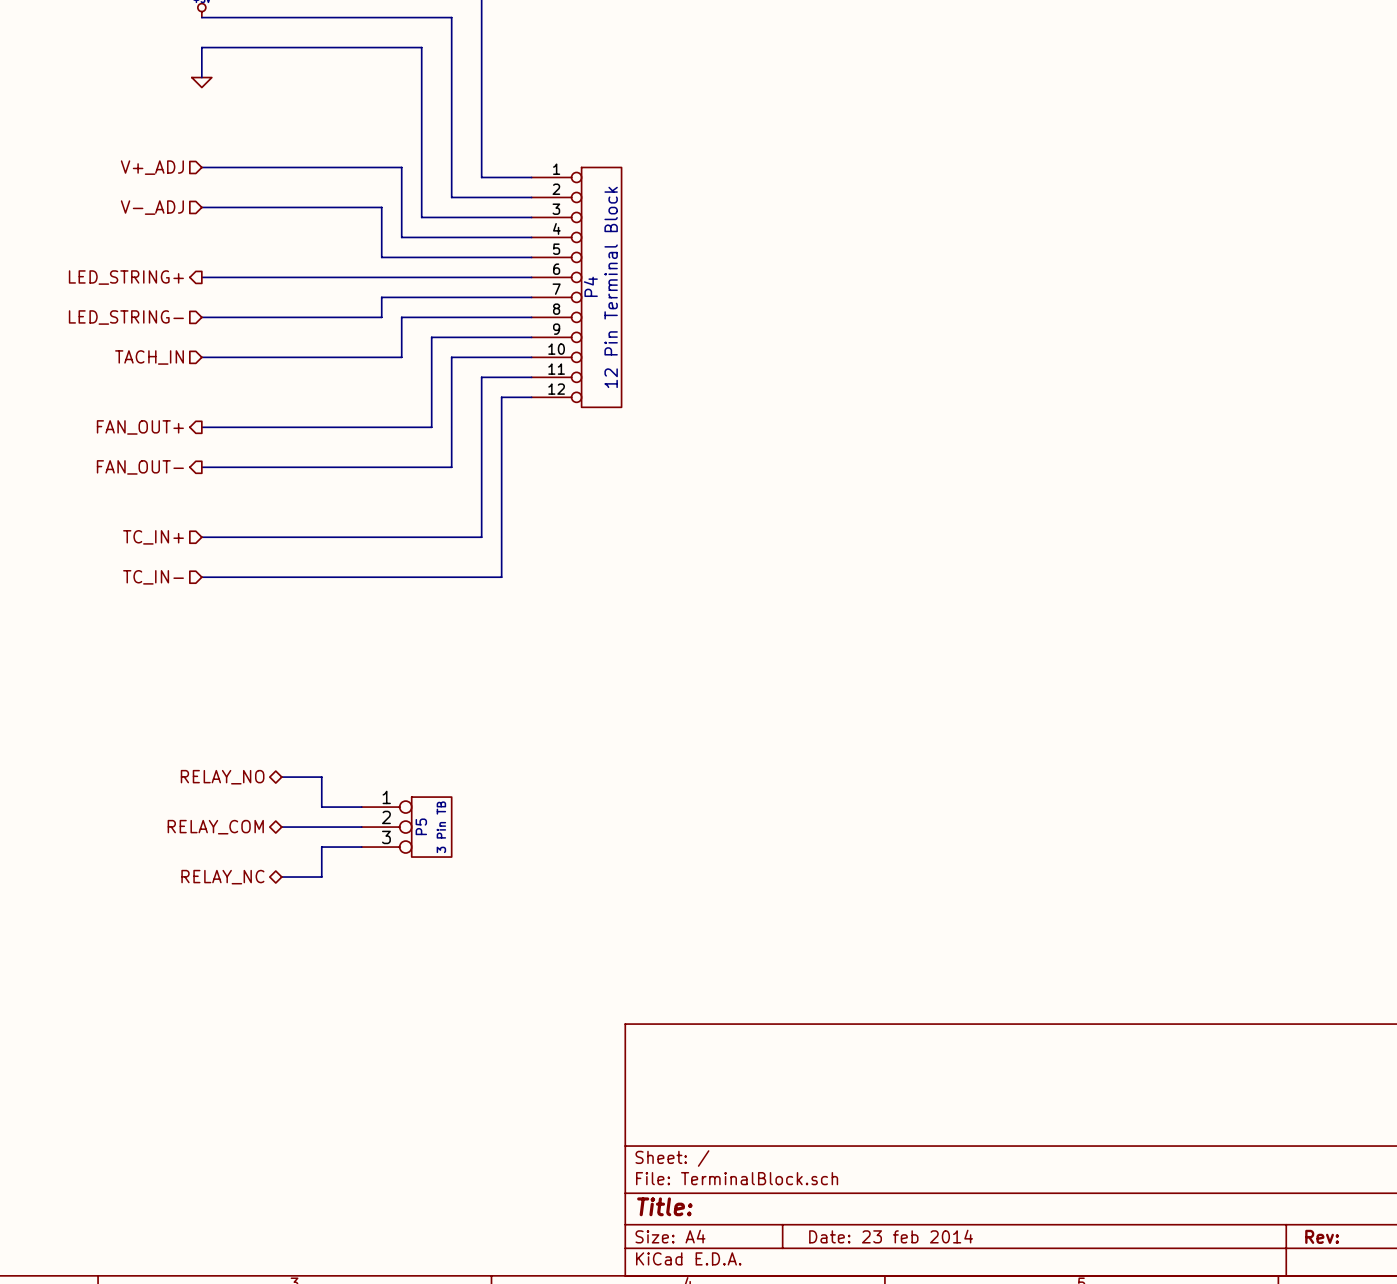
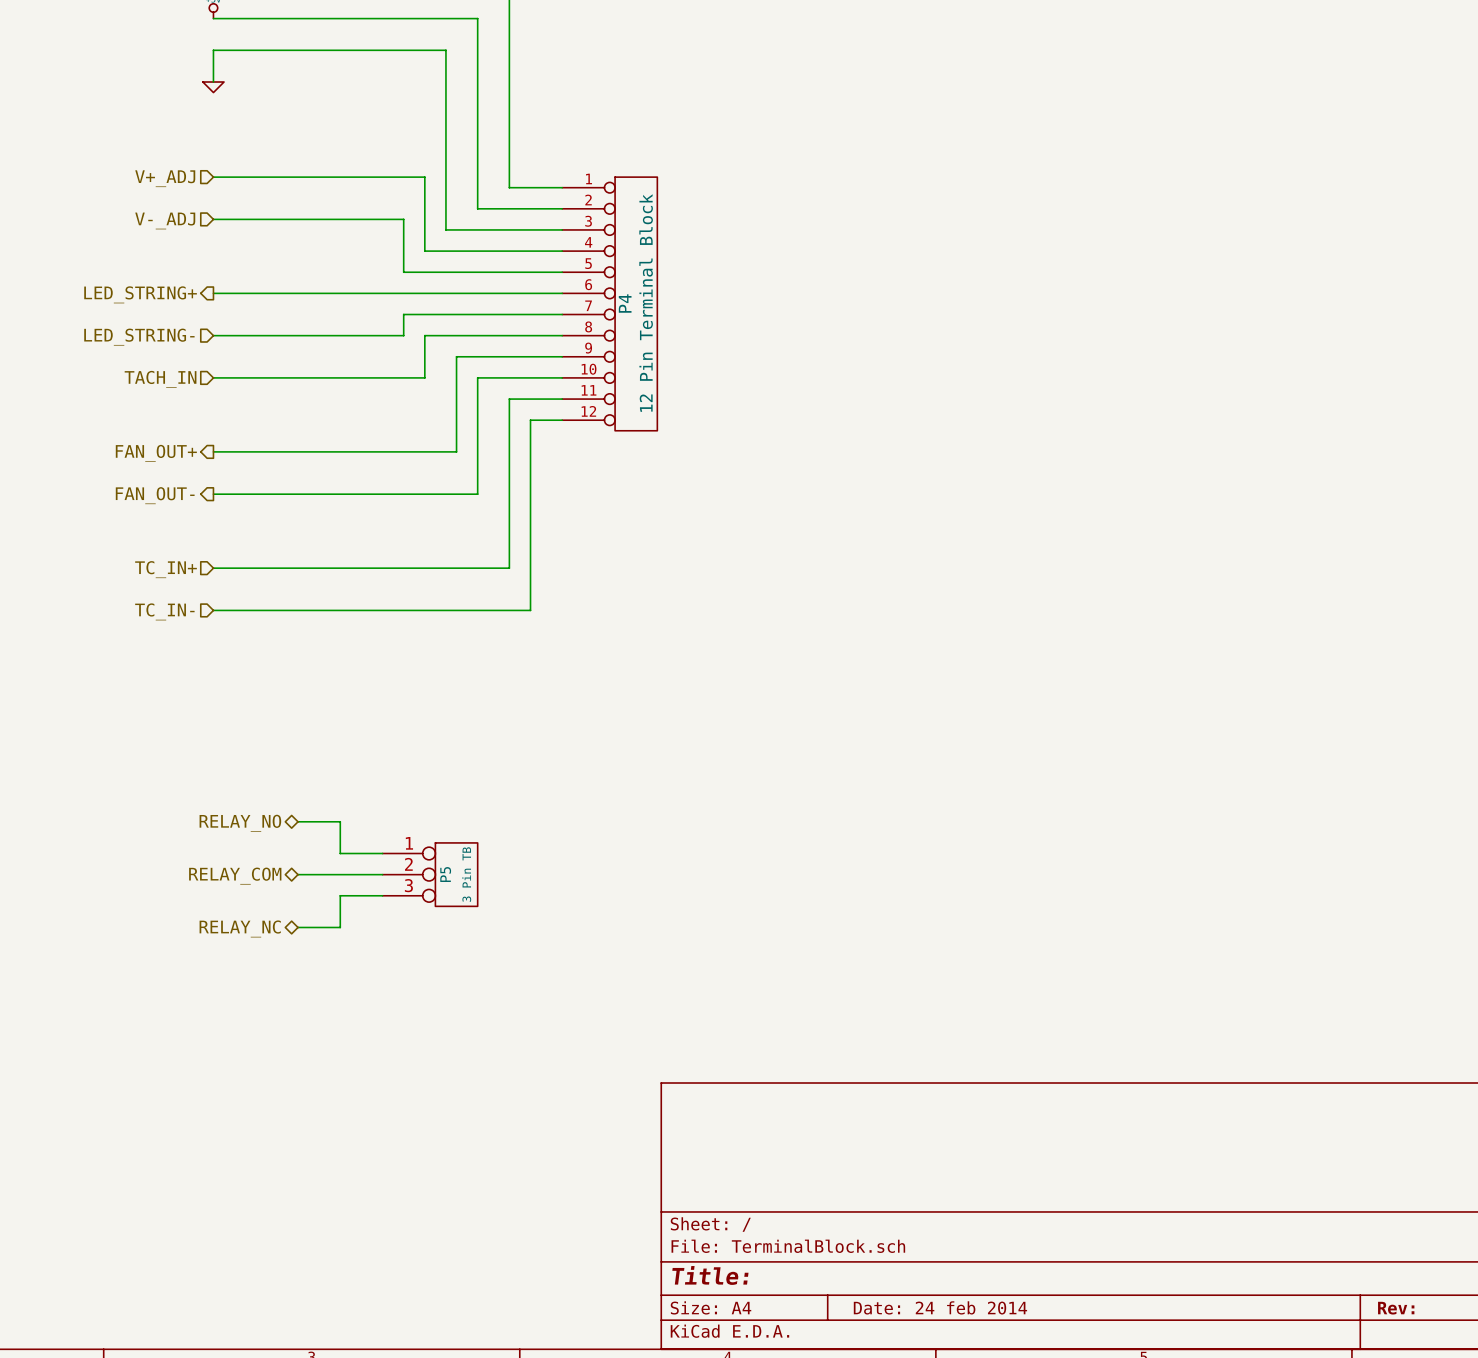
title block: Date: 23 feb 2014 (891, 1236) -> Date: 24 feb 2014 (940, 1307)

